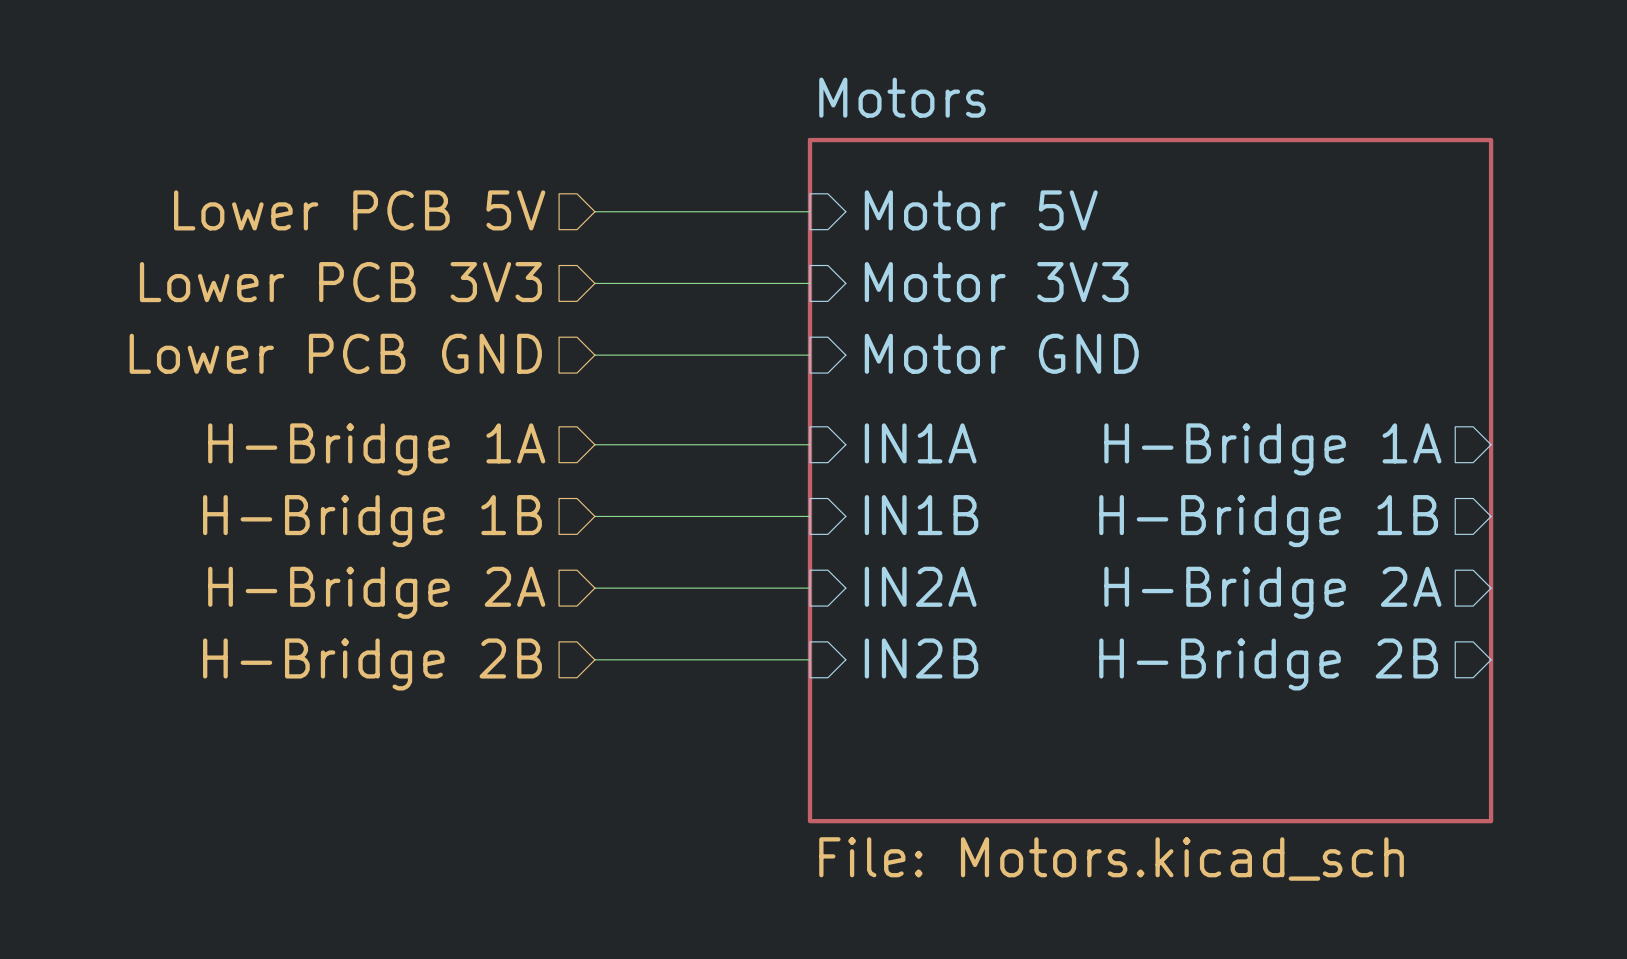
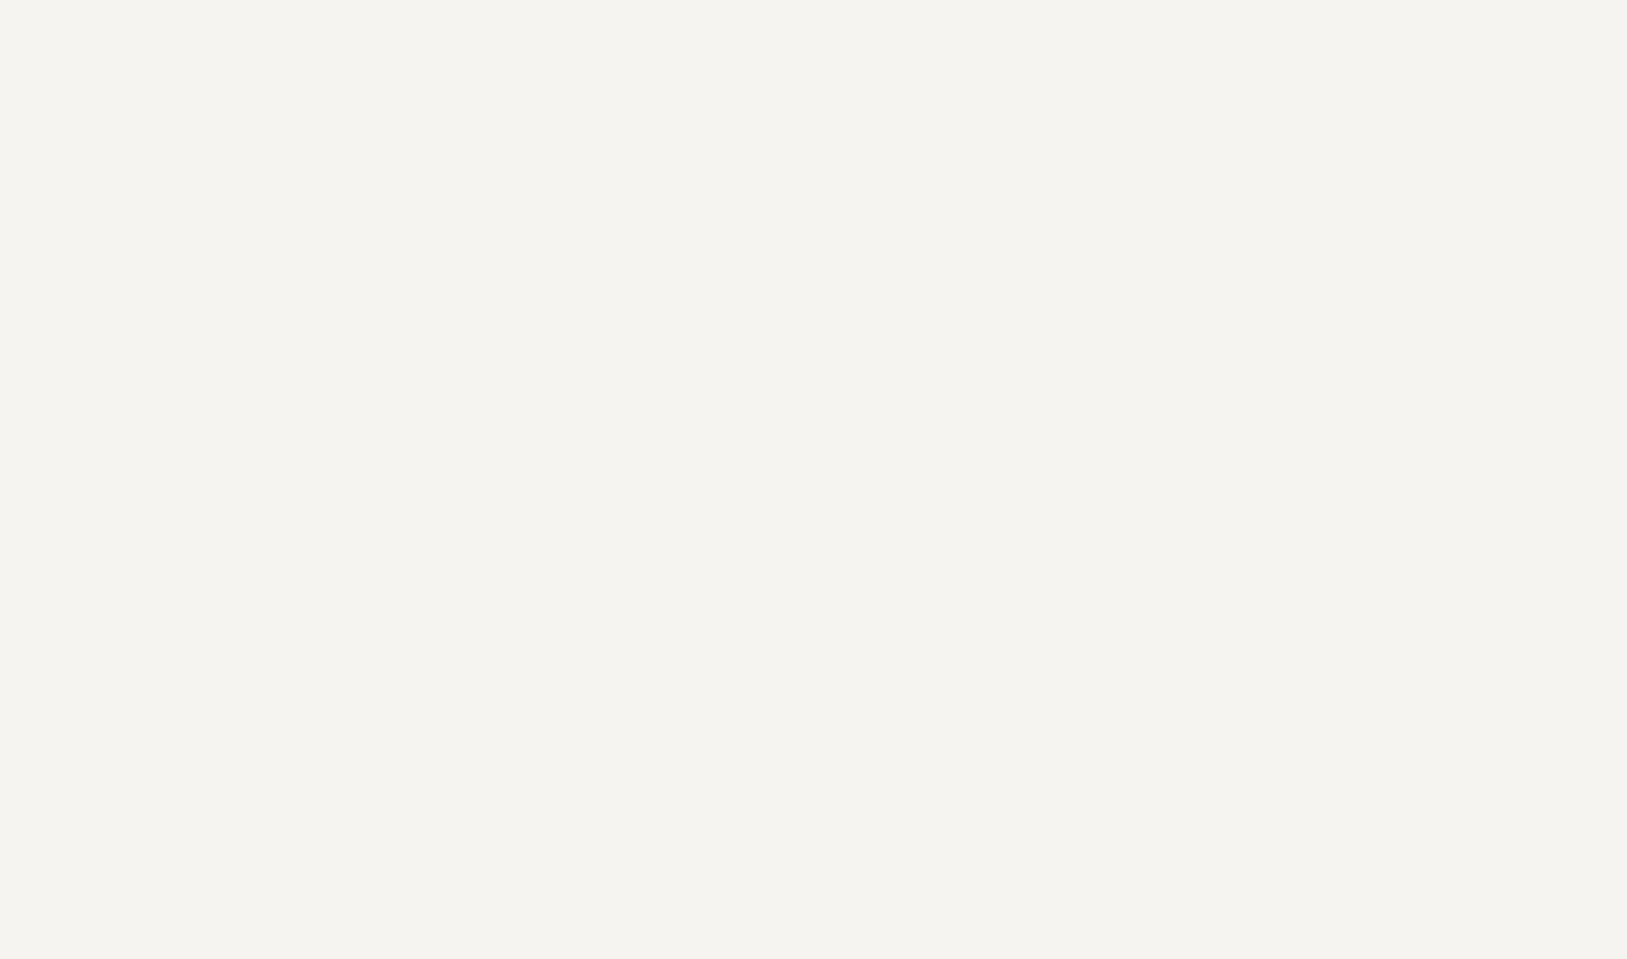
hierarchical label: Lower PCB 5V (359, 210) -> none
sheet pin: Motor 5V (981, 210) -> none
wire: (594, 211) (810, 211) -> none
hierarchical label: Lower PCB 3V3 (340, 282) -> none
sheet pin: Motor 3V3 (996, 282) -> none
wire: (594, 283) (810, 283) -> none
hierarchical label: Lower PCB GND (335, 353) -> none
sheet pin: Motor GND (1001, 353) -> none
wire: (594, 355) (810, 355) -> none
sheet pin: IN1A (920, 443) -> none
wire: (594, 444) (810, 444) -> none
hierarchical label: H-Bridge 1A (376, 449) -> none
sheet pin: H-Bridge 1A (1272, 449) -> none
sheet Motors: File: Motors.kicad_sch (1150, 480) -> none
sheet pin: IN1B (921, 515) -> none
wire: (594, 516) (810, 516) -> none
hierarchical label: H-Bridge 1B (372, 521) -> none
sheet pin: H-Bridge 1B (1268, 521) -> none
sheet pin: IN2A (920, 586) -> none
wire: (594, 588) (810, 588) -> none
hierarchical label: H-Bridge 2A (376, 592) -> none
sheet pin: H-Bridge 2A (1272, 592) -> none
sheet pin: IN2B (921, 658) -> none
wire: (594, 659) (810, 659) -> none
hierarchical label: H-Bridge 2B (372, 664) -> none
sheet pin: H-Bridge 2B (1268, 664) -> none

